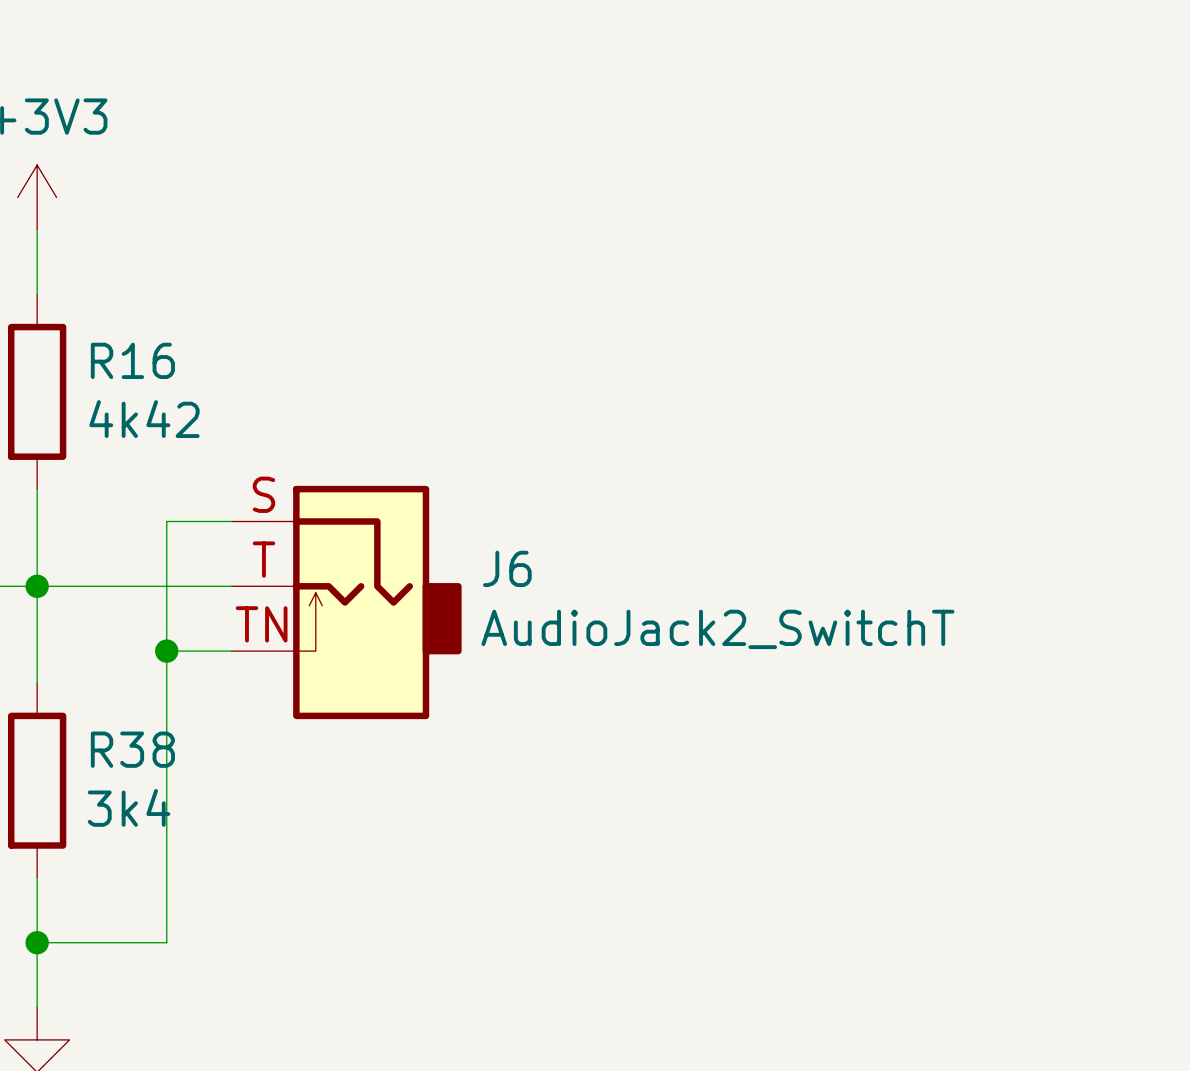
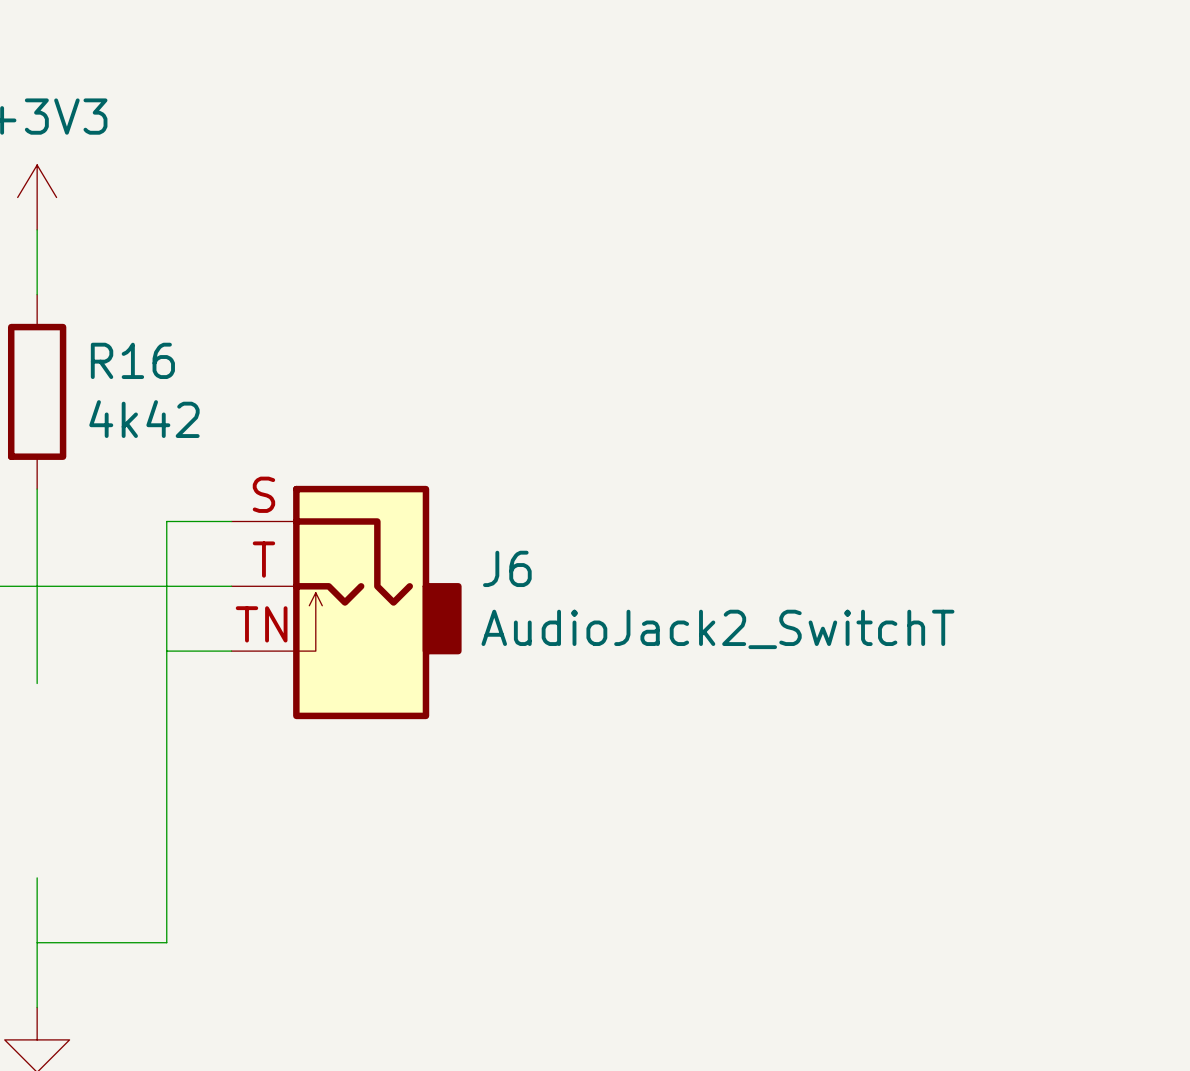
junction: (37, 586) -> none
junction: (166, 651) -> none
R38: 3k4 (37, 780) -> none
junction: (37, 942) -> none

